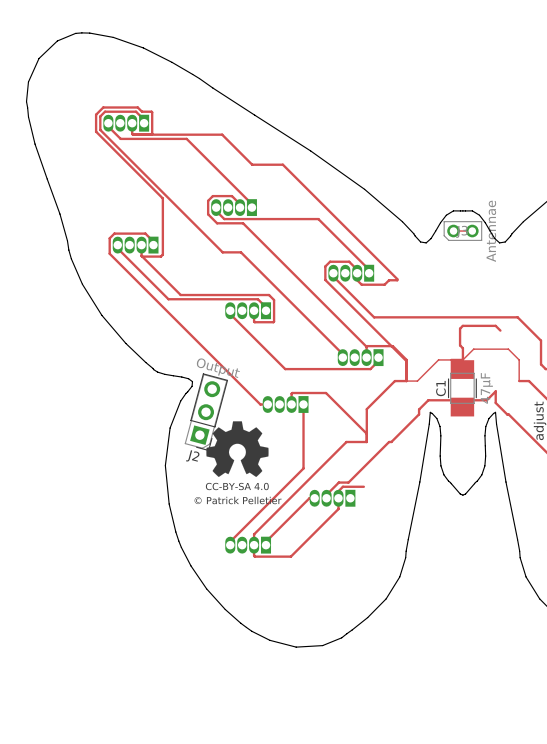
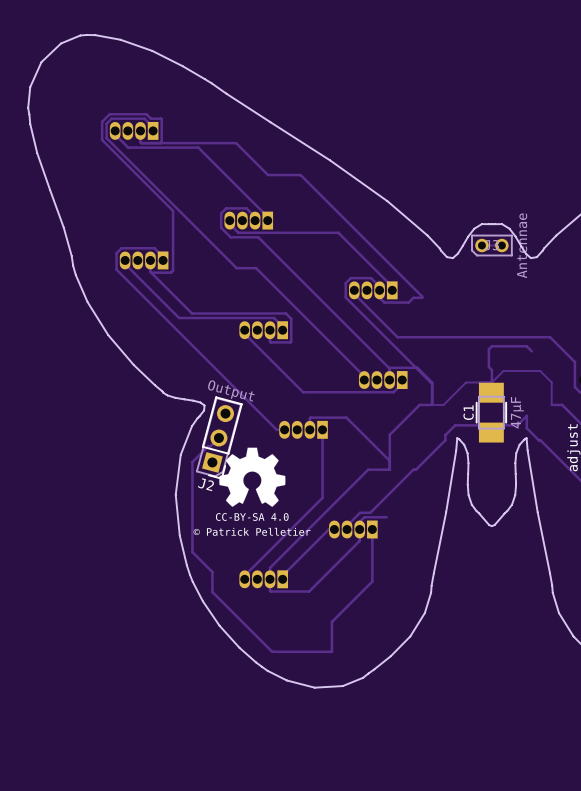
track: none -> (218, 438) (192, 462) (192, 552) (212, 572) (212, 592) (272, 651) (331, 651) (331, 621) (372, 581) (372, 529)

